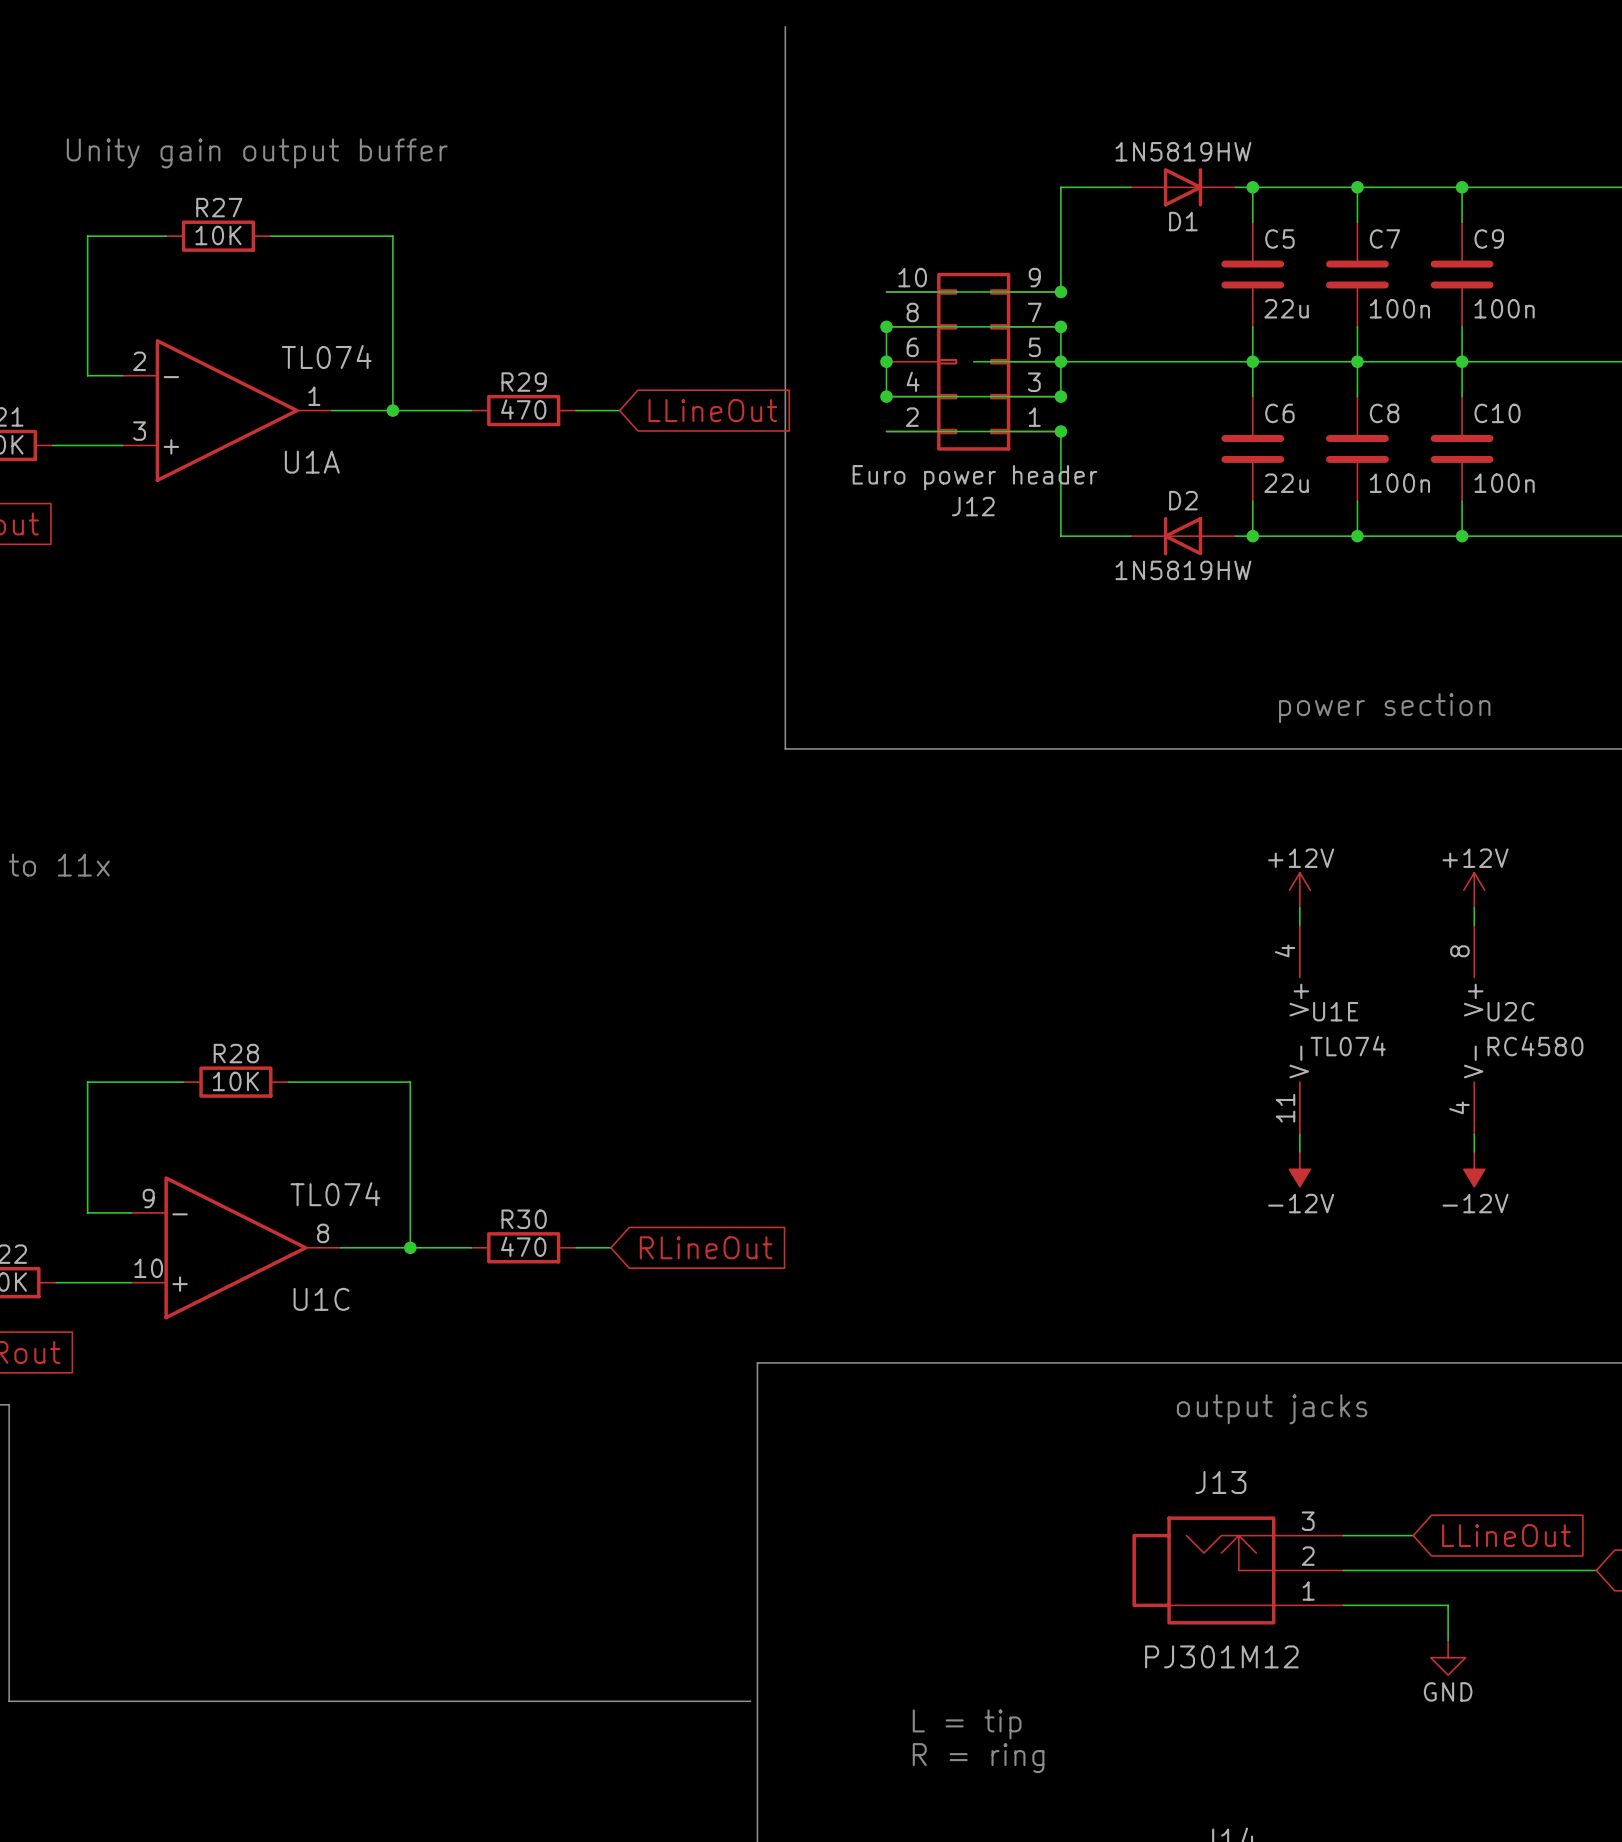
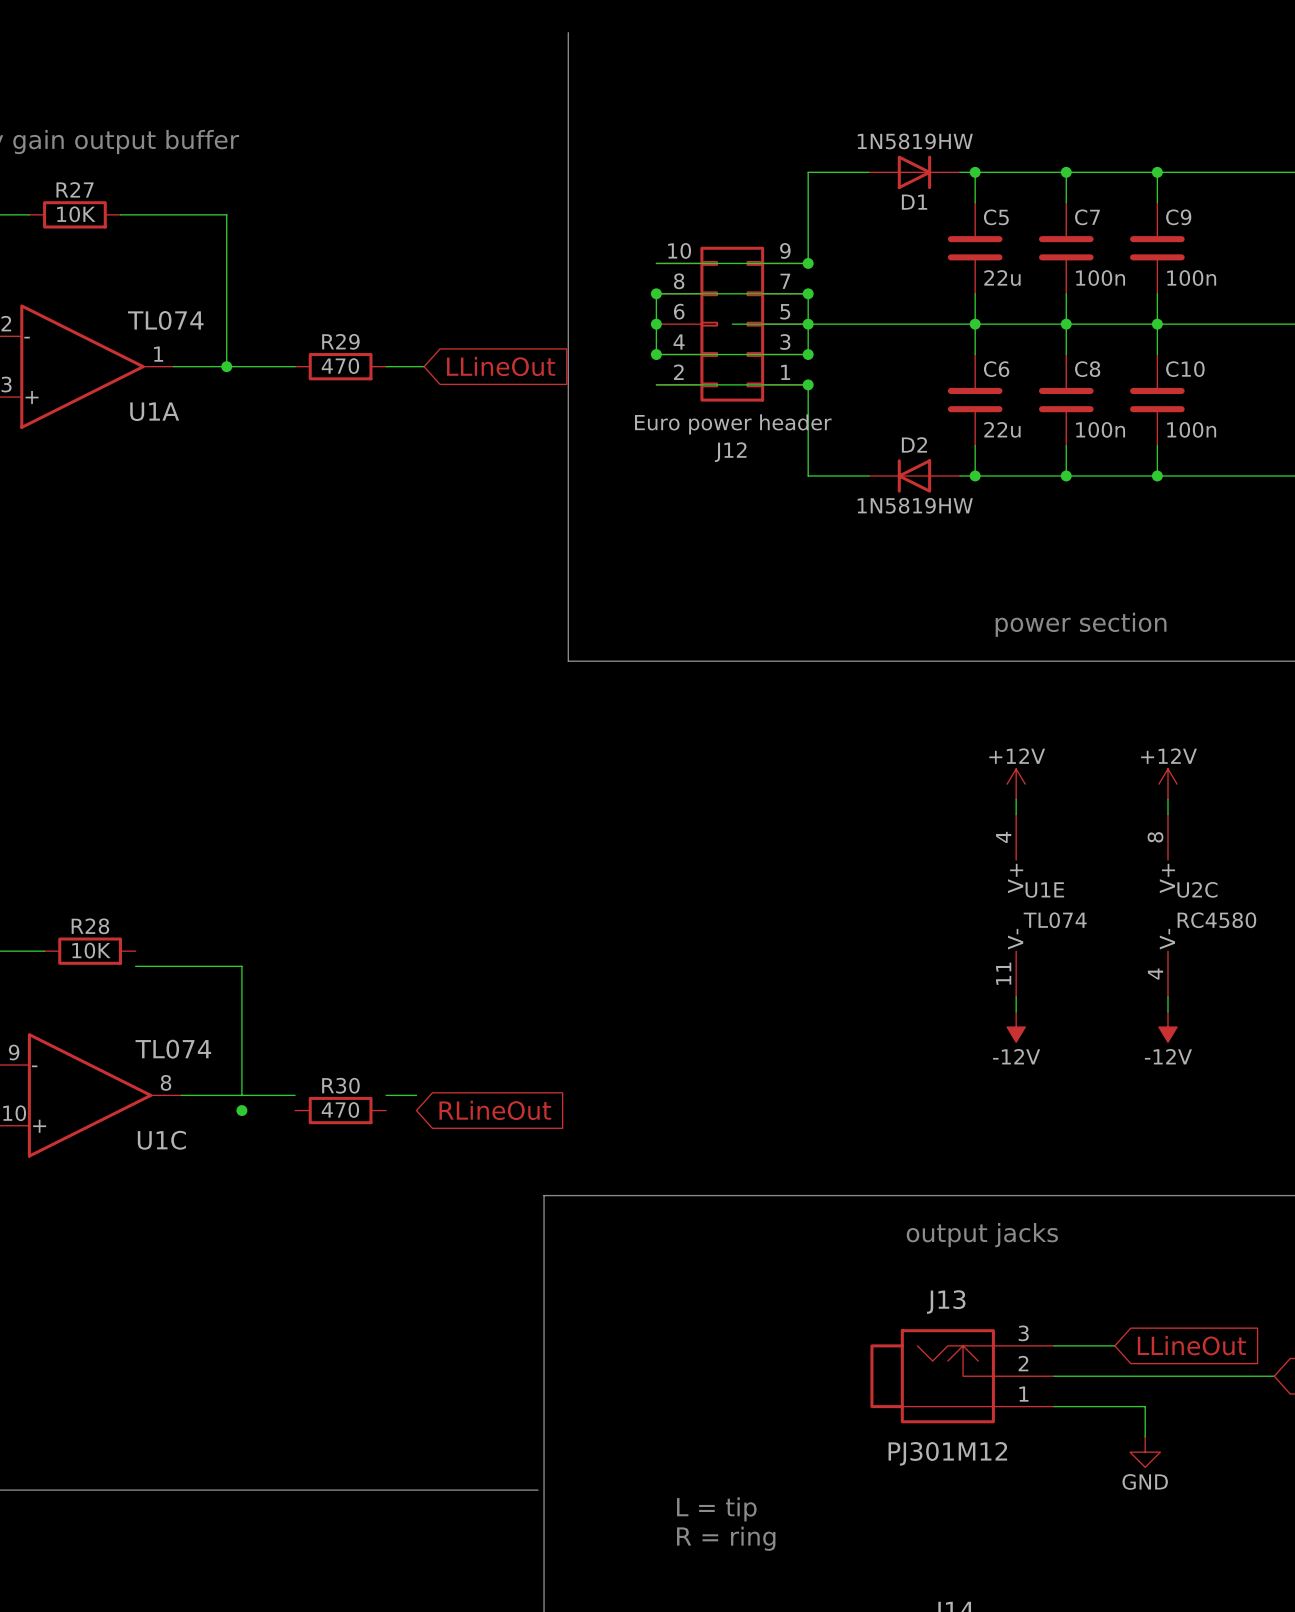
wire: (288, 1082) (410, 1082) (410, 1099) -> (135, 966) (241, 966)
junction position: (410, 1247) -> (241, 1110)
R30 position: (523, 1247) -> (340, 1110)
global label position: RLineOut (706, 1247) -> RLineOut (495, 1110)

